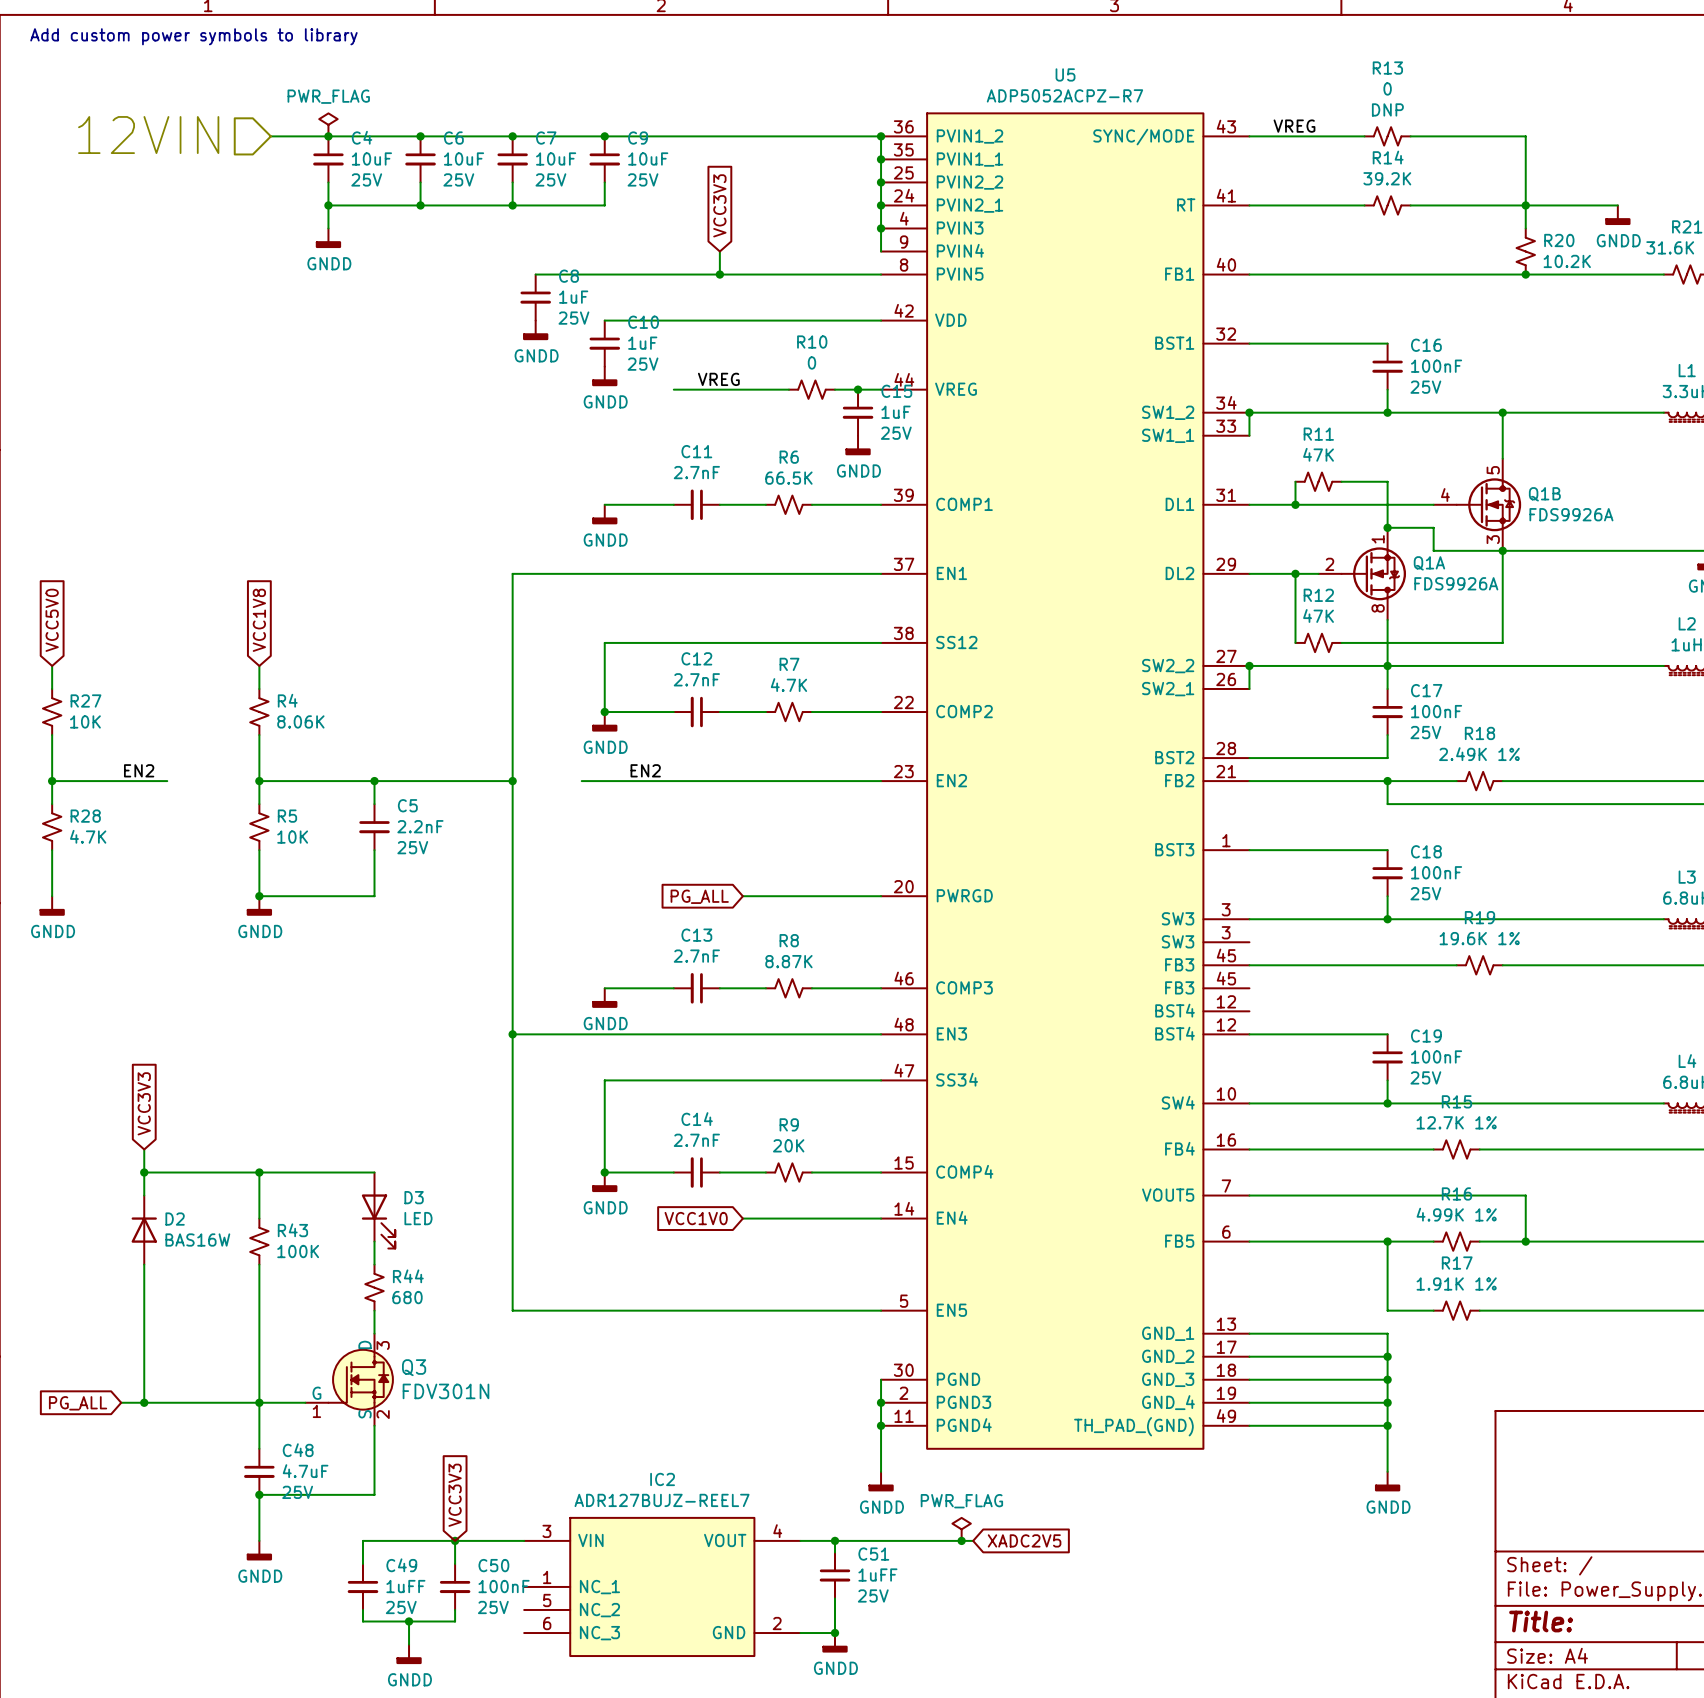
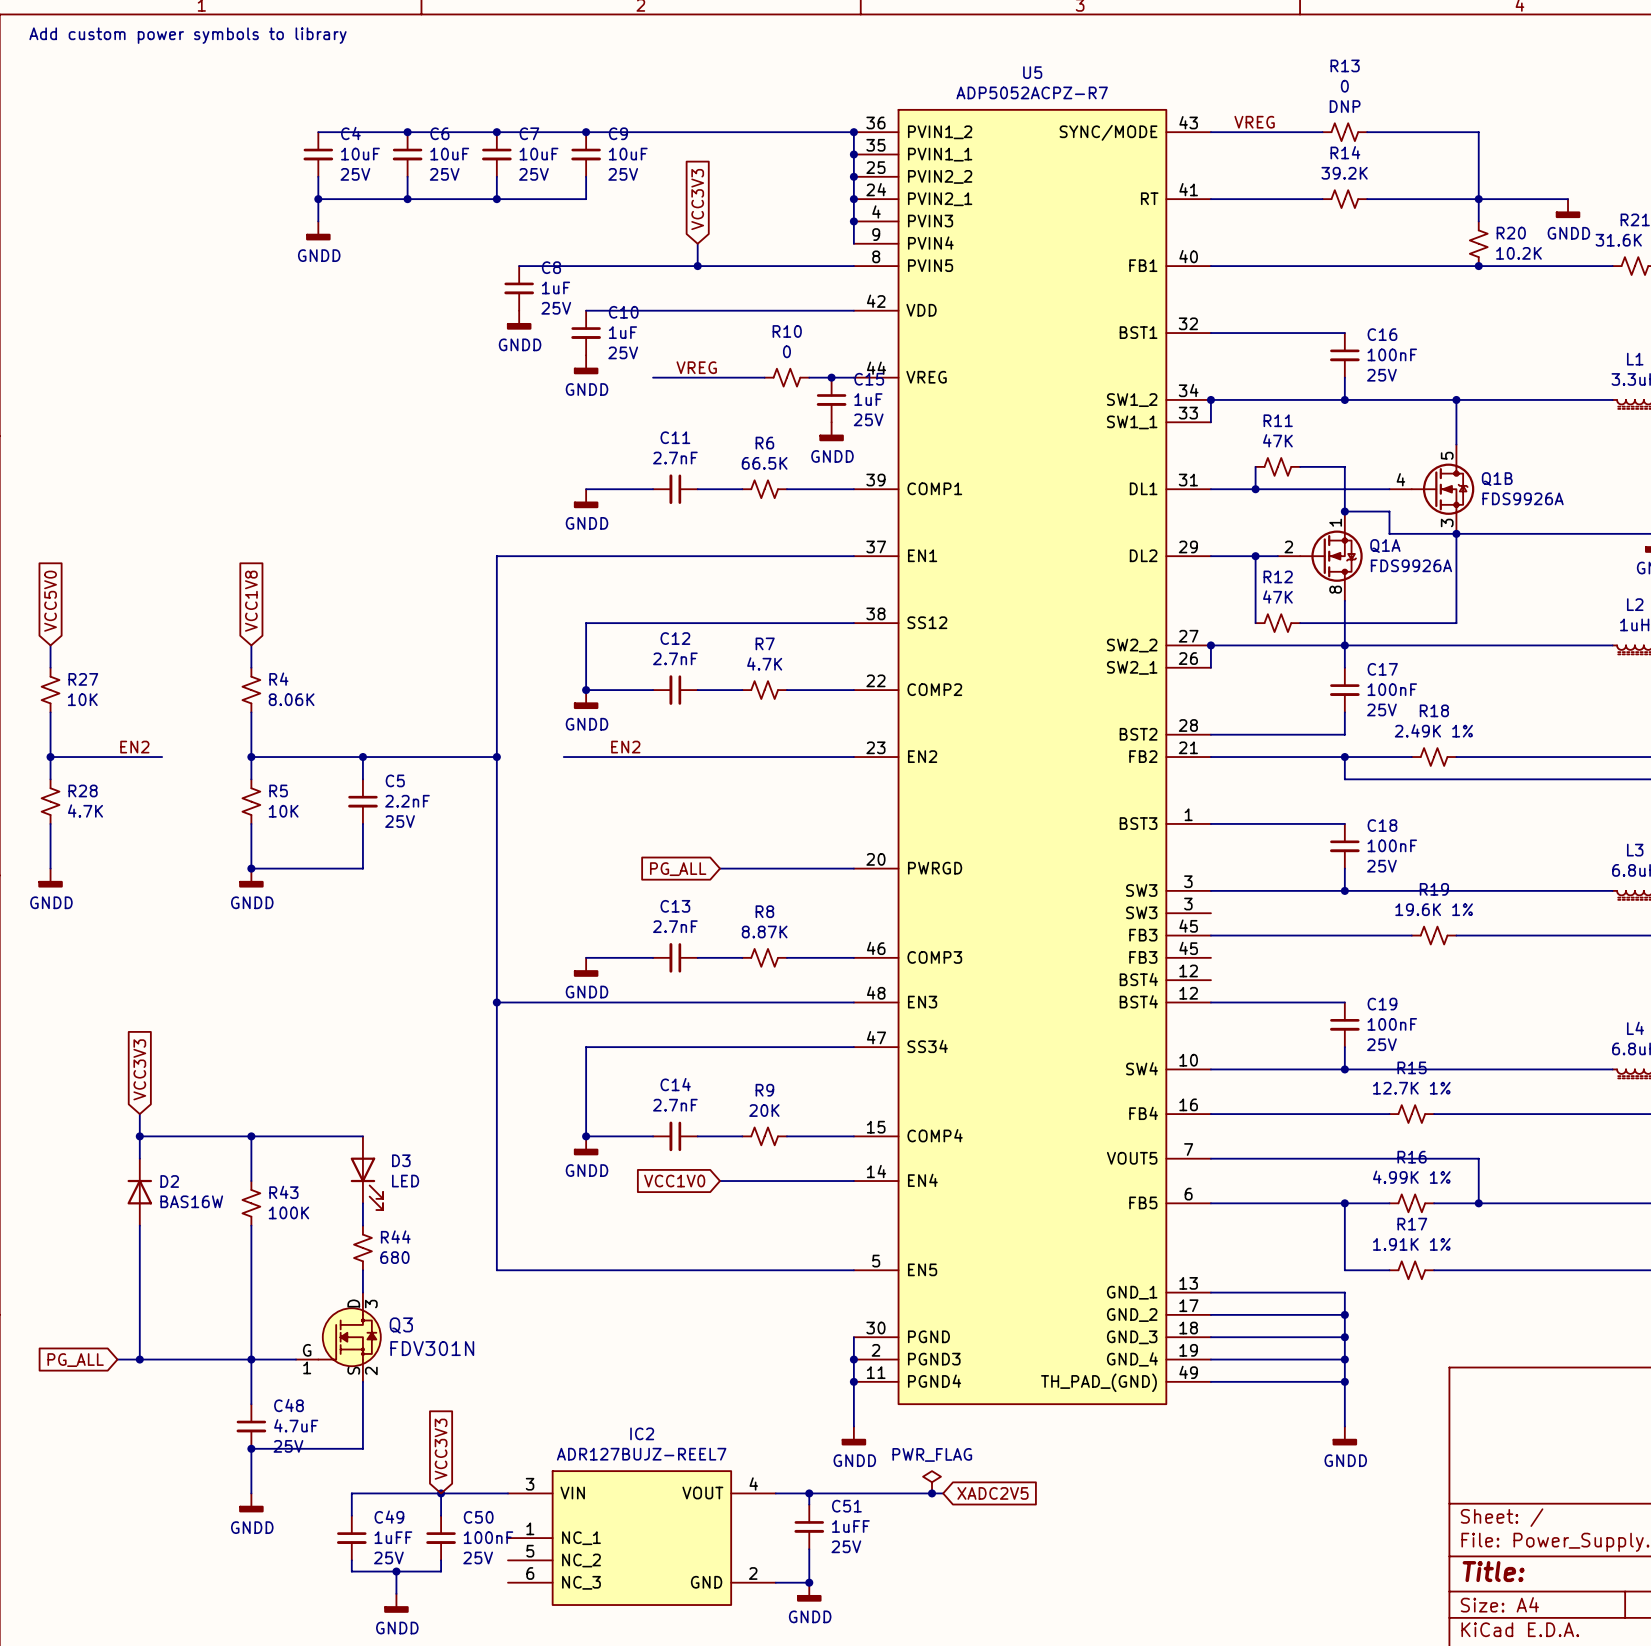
power symbol: PWR_FLAG (328, 124) -> none
hierarchical label: 12VIN (148, 135) -> none
wire: (270, 136) (328, 136) -> none
junction: (328, 136) -> none

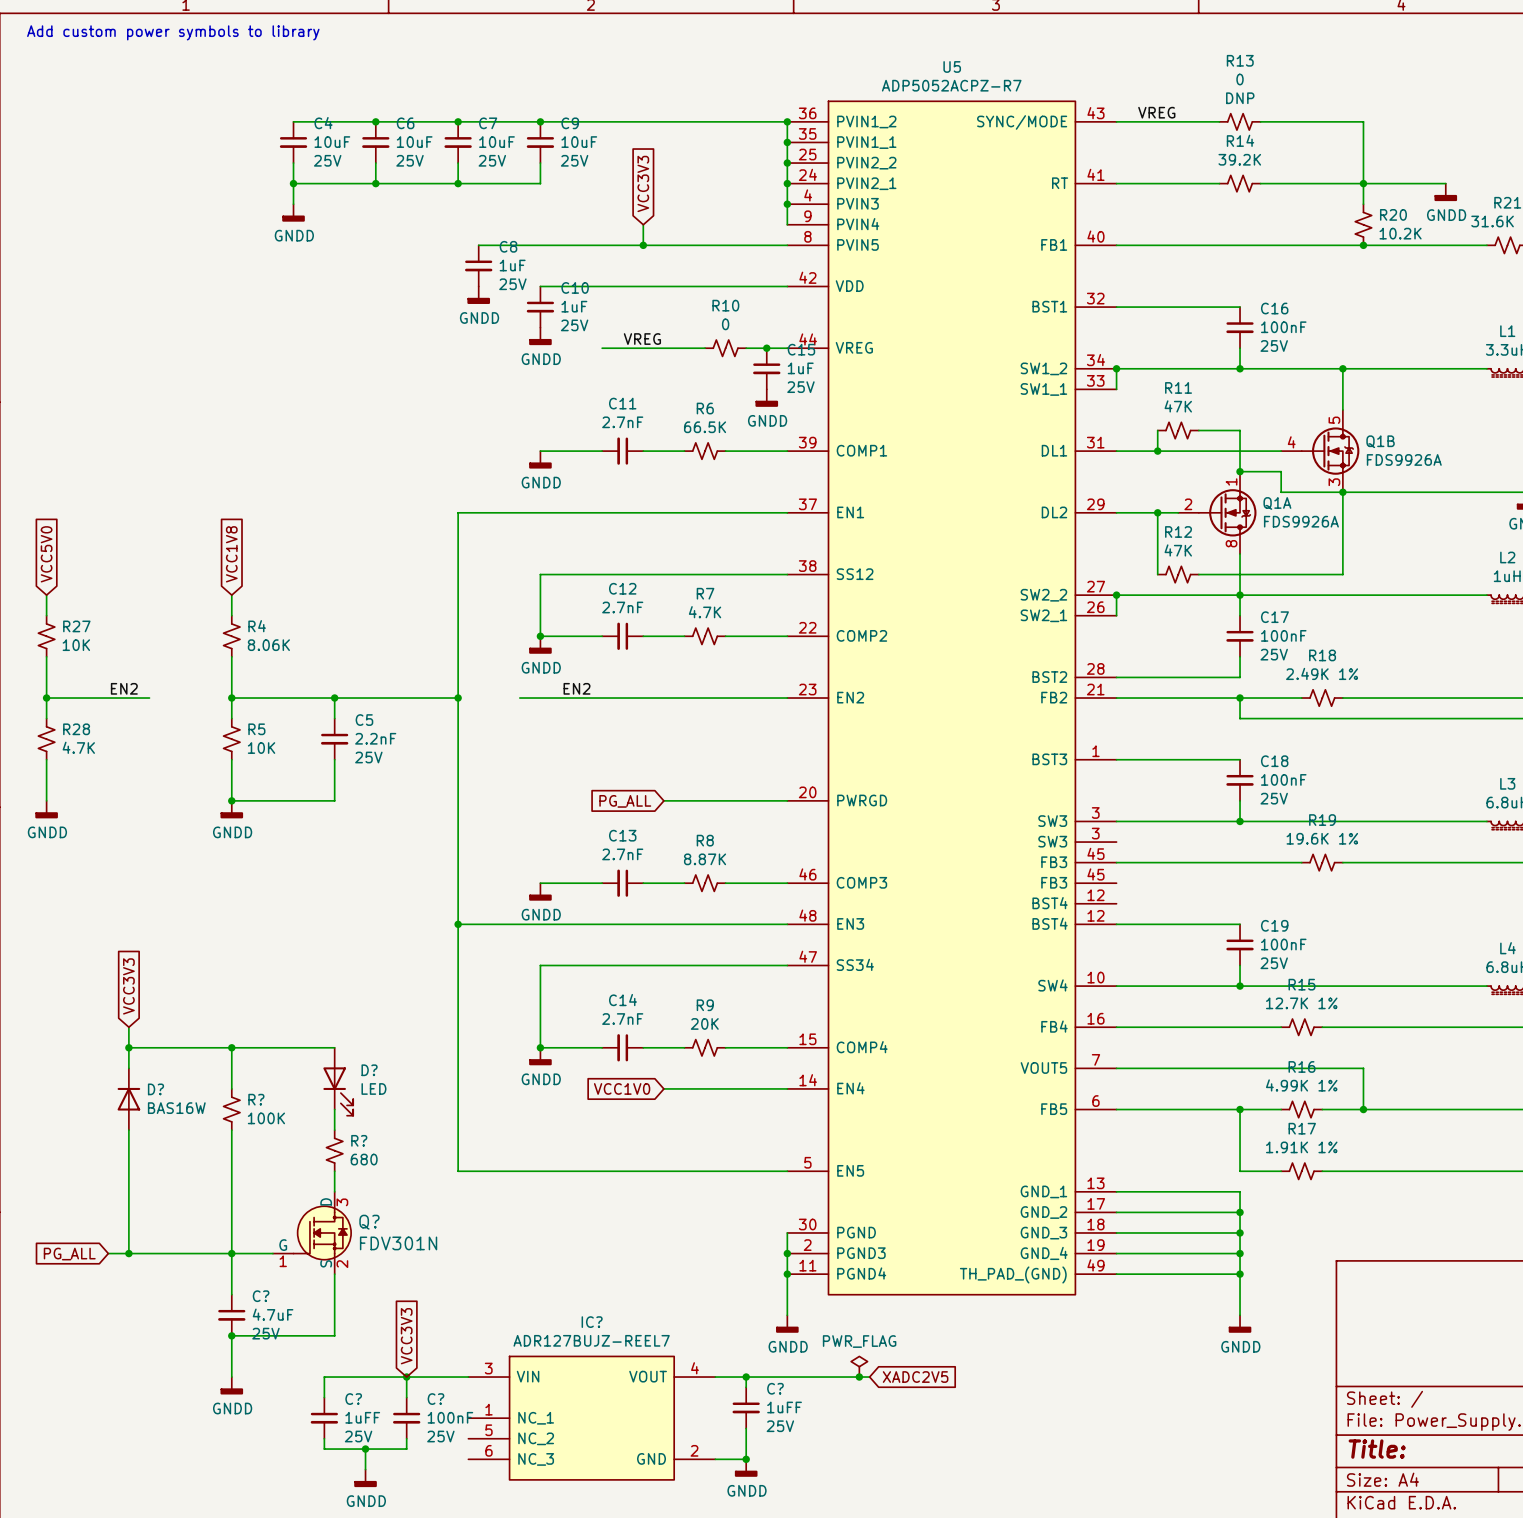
D3 name: D3 (401, 1160) -> D? (369, 1070)
D2 name: D2 (169, 1181) -> D? (155, 1089)
R43 name: R43 (283, 1192) -> R? (256, 1099)
R44 name: R44 (395, 1237) -> R? (359, 1140)
Q3 name: Q3 (401, 1325) -> Q? (369, 1222)
C48 name: C48 (289, 1405) -> C? (261, 1296)
IC2 name: IC2 (642, 1433) -> IC? (592, 1322)
C51 name: C51 (846, 1506) -> C? (775, 1388)
C49 name: C49 (389, 1517) -> C? (353, 1399)
C50 name: C50 (478, 1517) -> C? (435, 1399)

